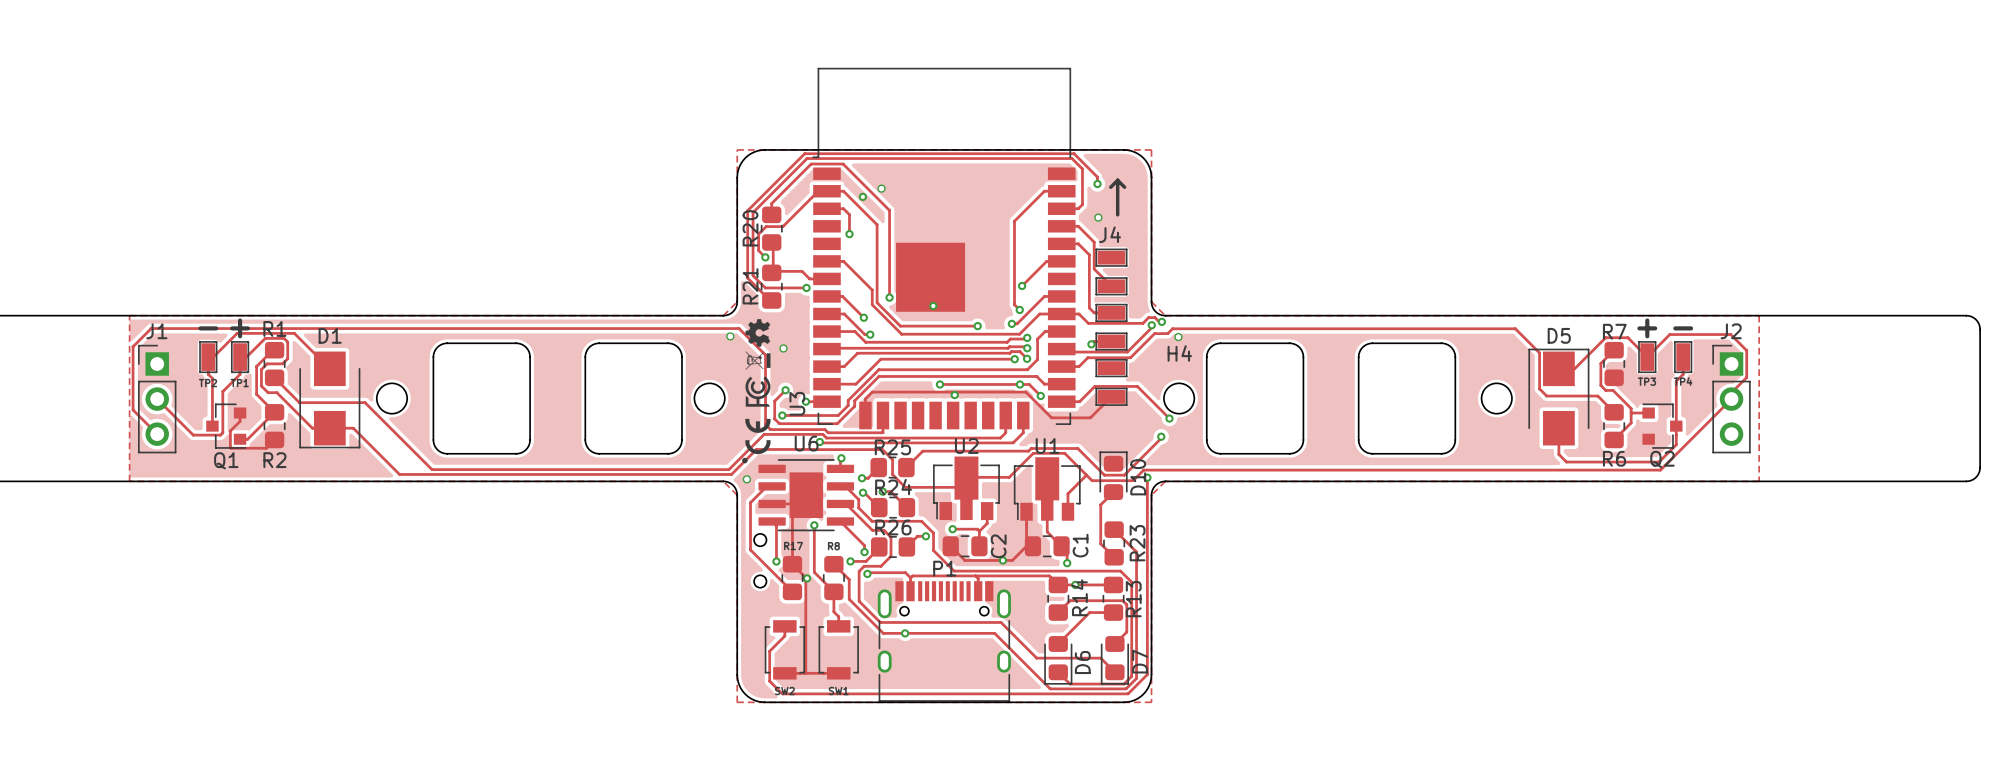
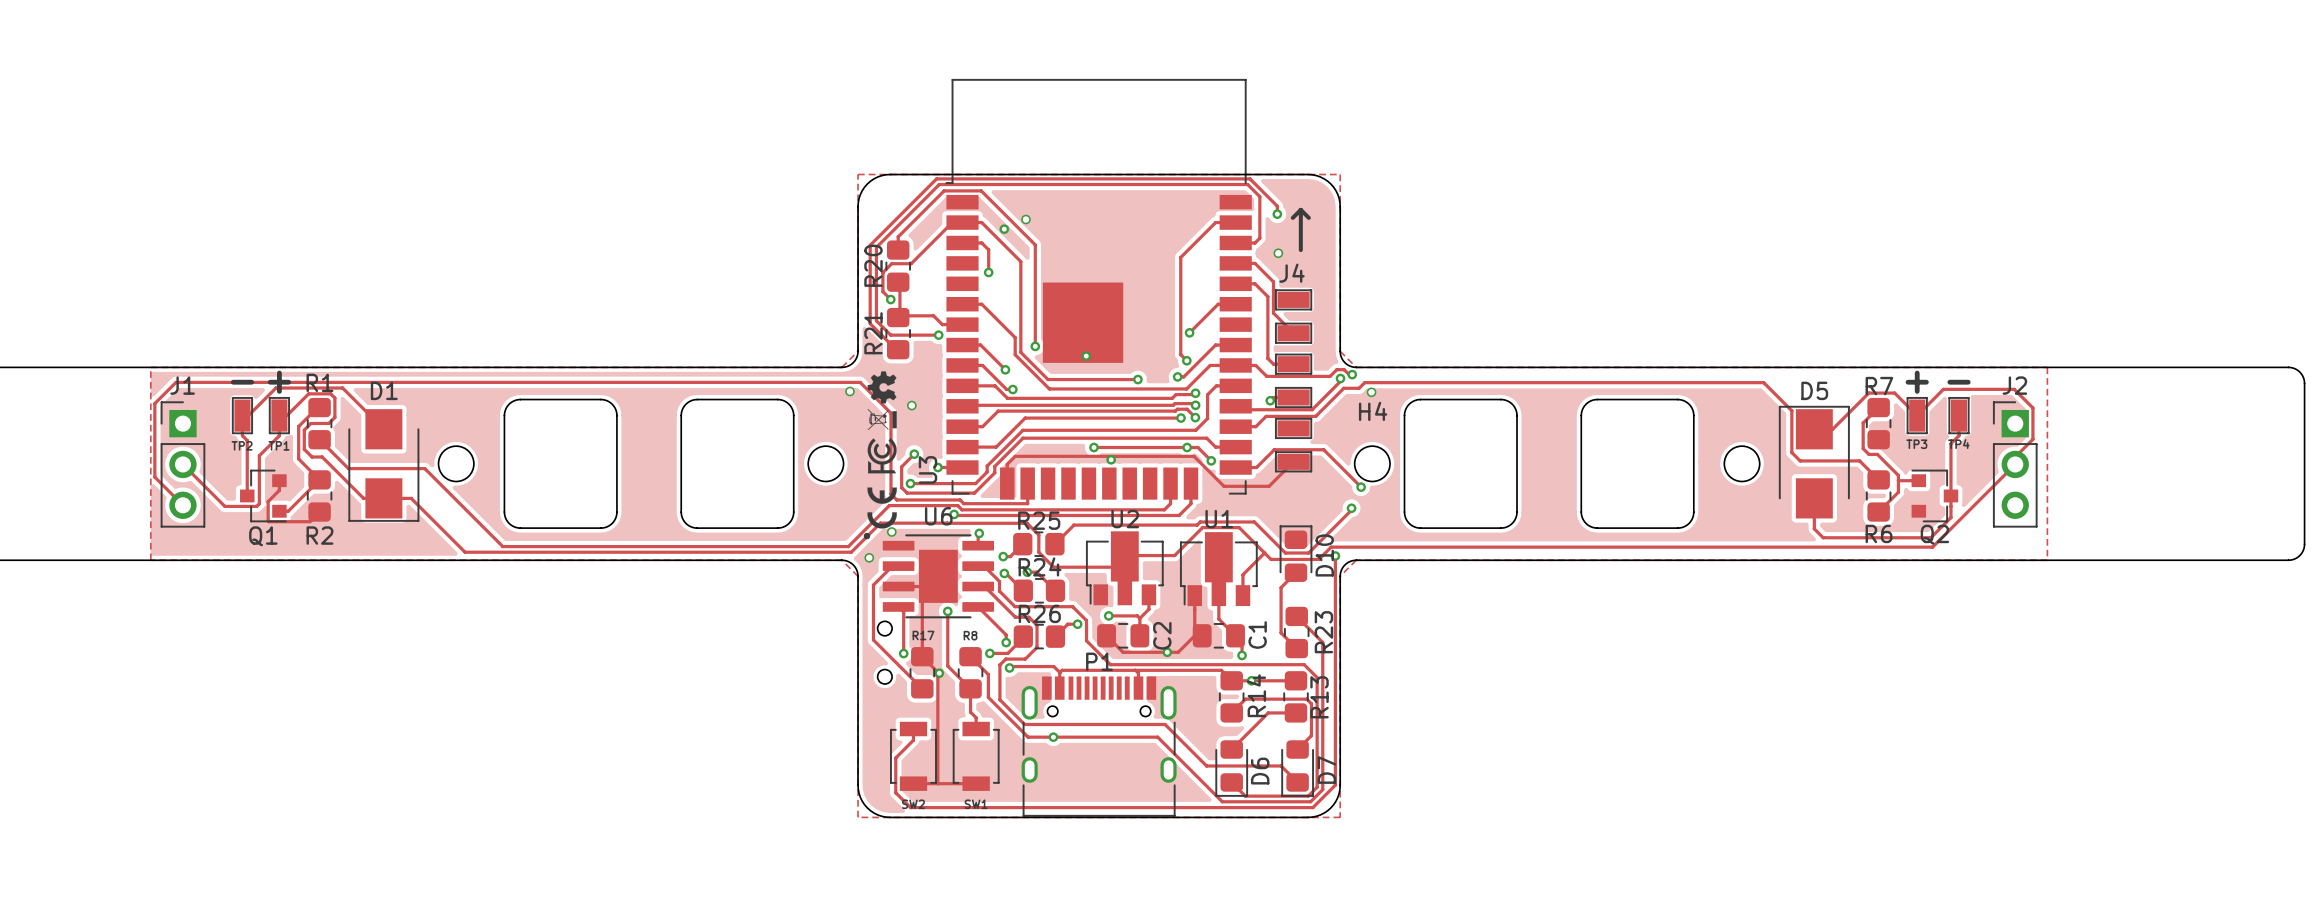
via: none -> (891, 531)

